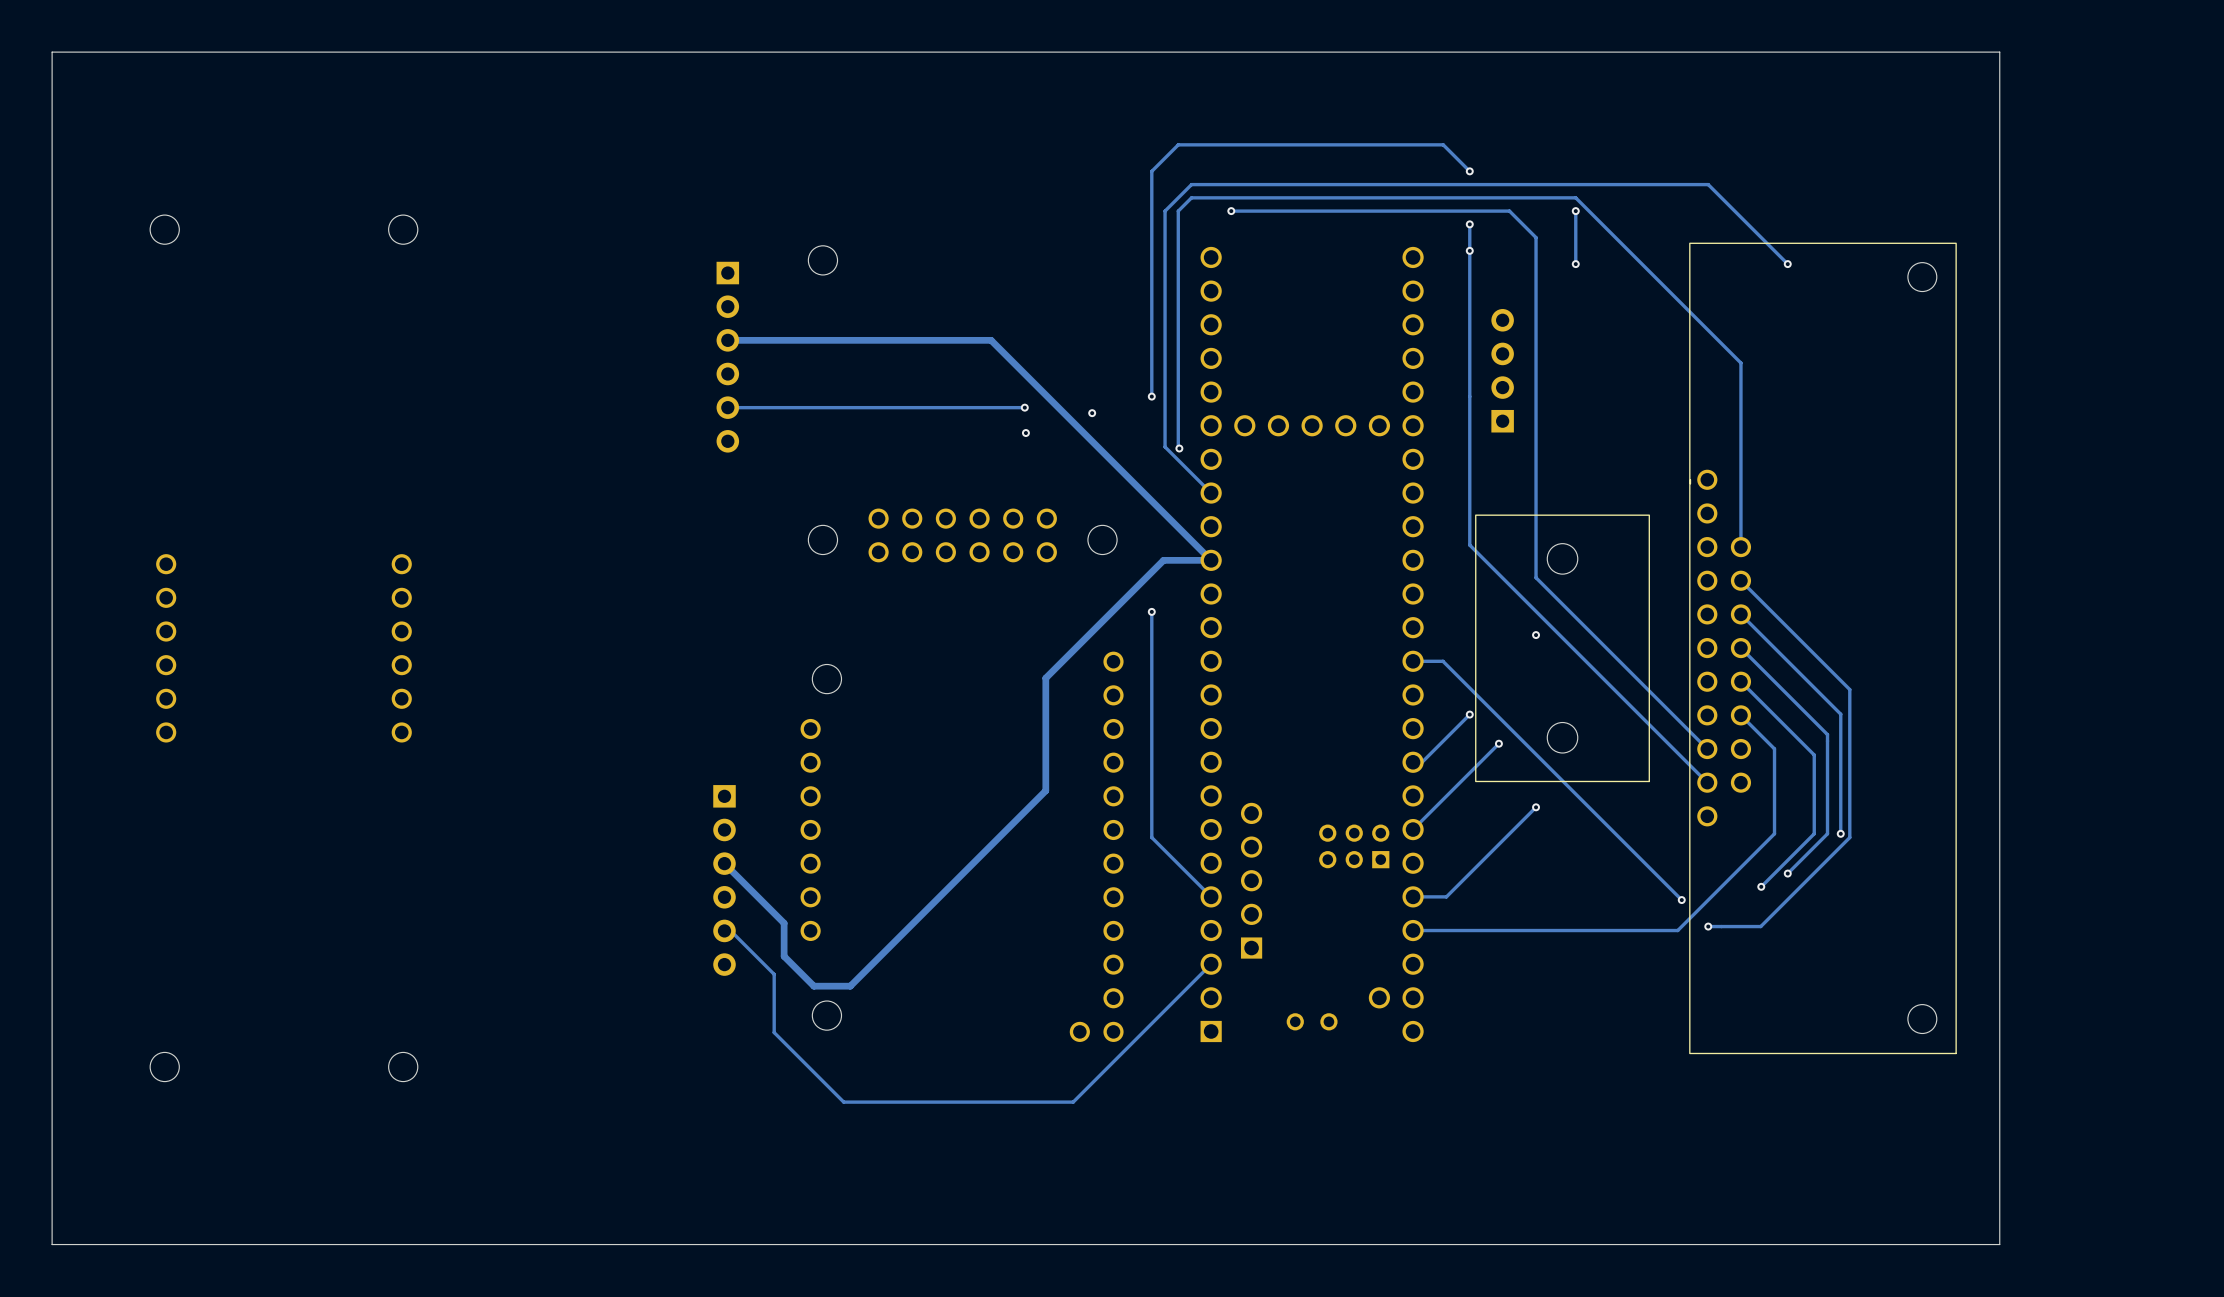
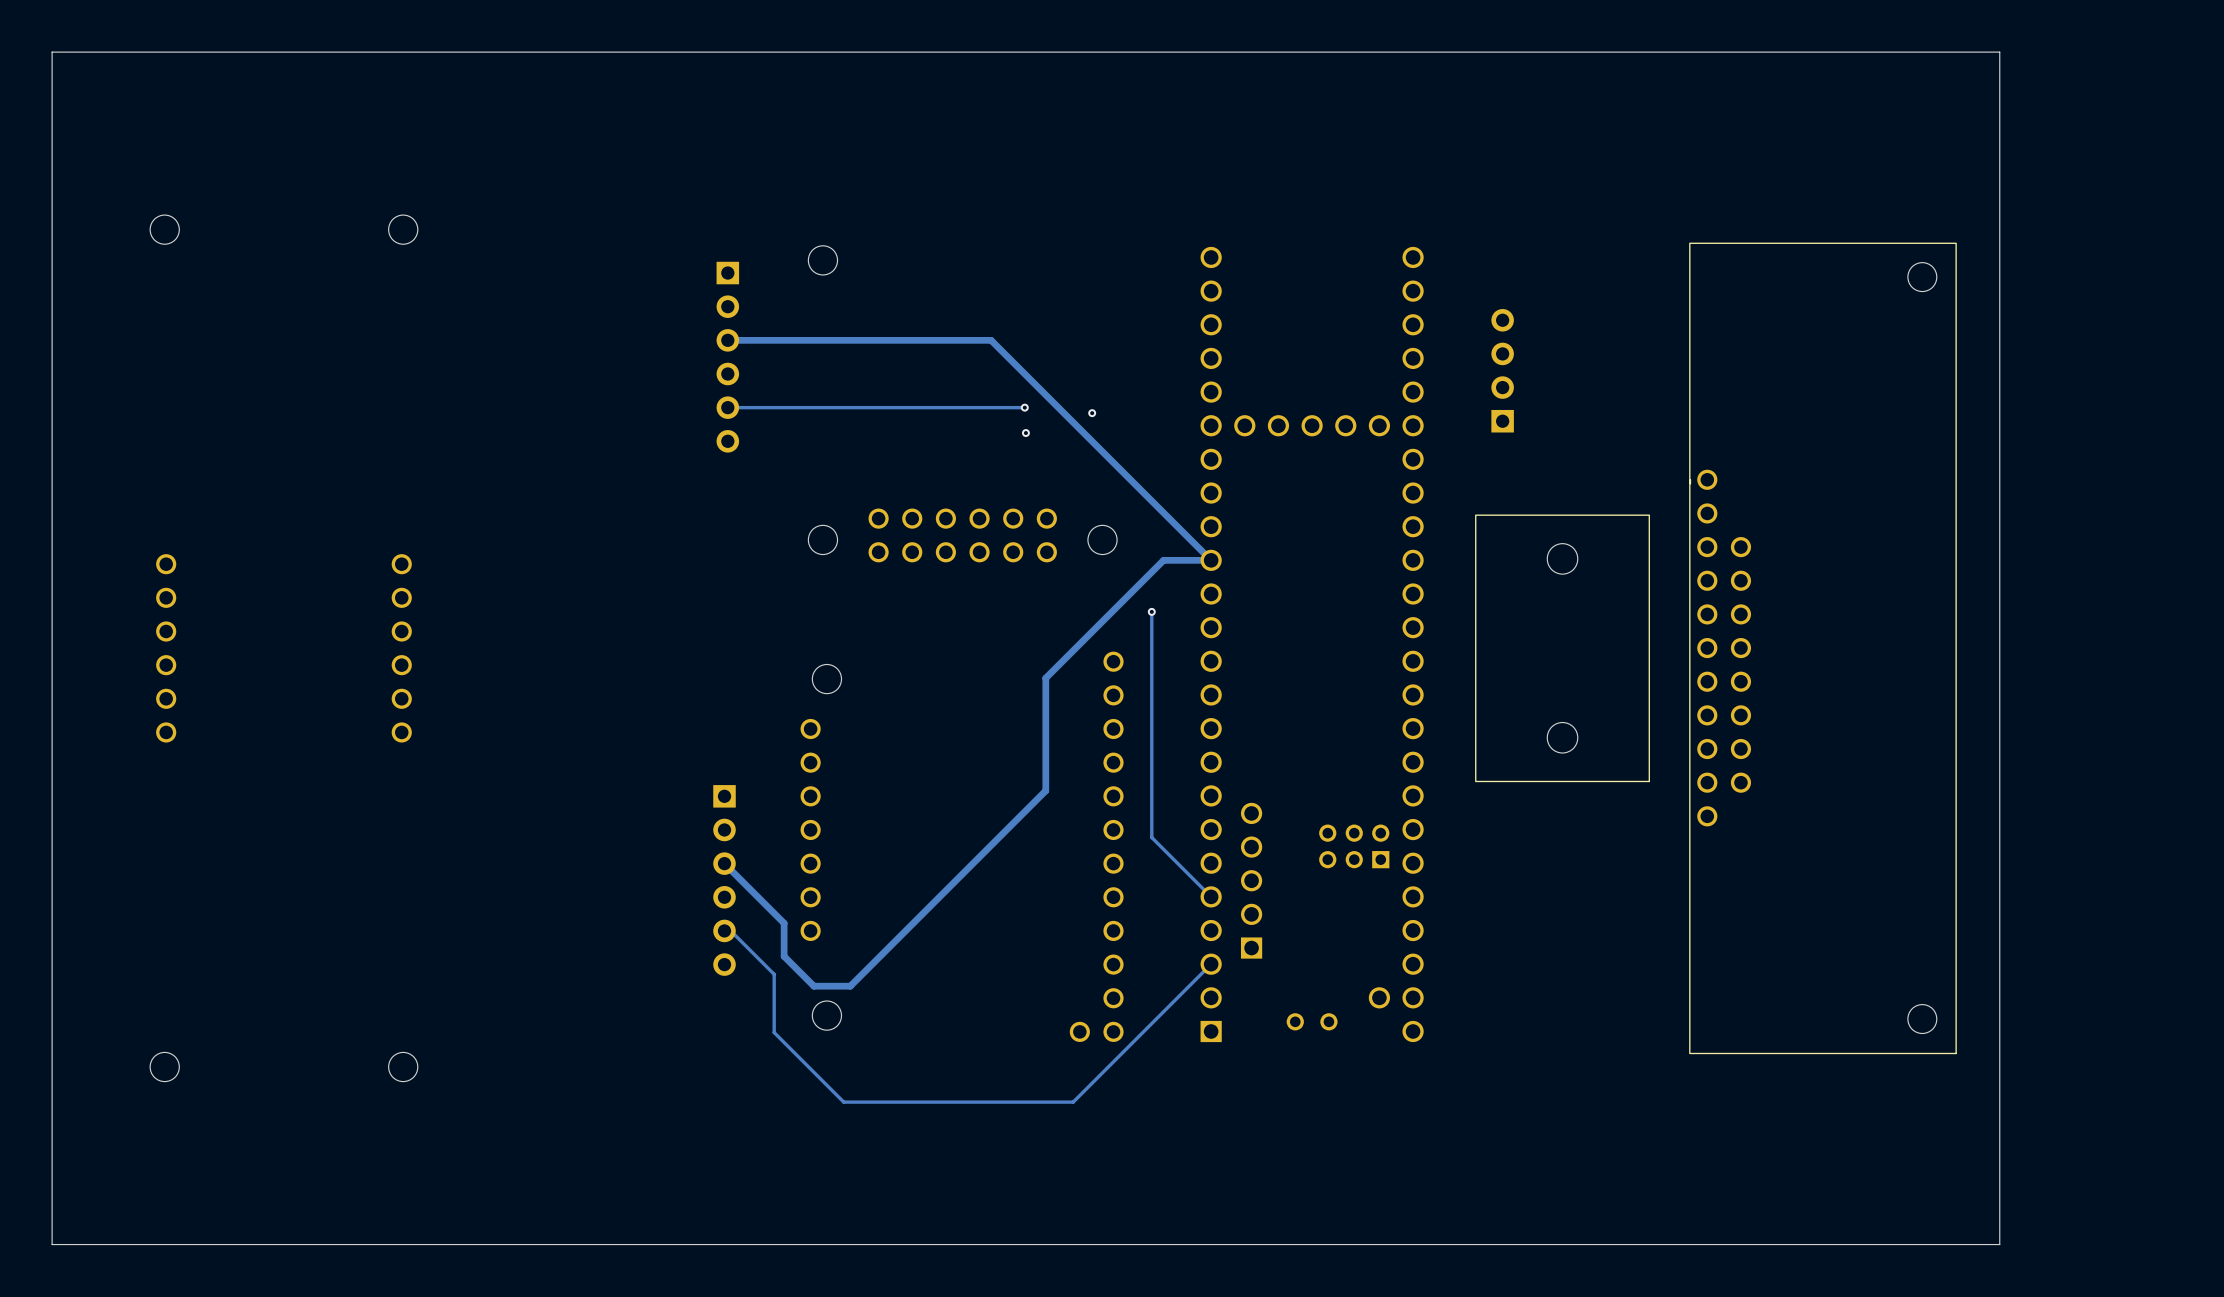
track: (1469, 171) (1443, 144) (1178, 144) (1151, 171) (1151, 396) -> none
via: (1469, 171) -> none
track: (1231, 211) (1509, 211) (1536, 237) (1536, 577) (1707, 749) -> none
via: (1231, 211) -> none
track: (1575, 211) (1575, 264) -> none
via: (1575, 211) -> none
track: (1469, 224) (1469, 545) (1707, 782) -> none
via: (1469, 224) -> none
via: (1469, 250) -> none
via: (1575, 264) -> none
track: (1787, 264) (1708, 184) (1191, 184) (1165, 211) (1165, 446) (1211, 493) -> none
via: (1787, 264) -> none
via: (1151, 396) -> none
track: (1179, 448) (1178, 211) (1191, 197) (1575, 197) (1740, 363) (1740, 547) -> none
via: (1179, 448) -> none
track: (1740, 580) (1849, 689) (1849, 837) (1760, 926) (1708, 926) -> none
track: (1740, 614) (1840, 714) (1840, 833) -> none
via: (1536, 635) -> none
track: (1740, 648) (1827, 734) (1827, 833) (1787, 873) -> none
track: (1413, 661) (1443, 661) (1681, 900) -> none
track: (1740, 681) (1814, 755) (1814, 833) (1761, 886) -> none
track: (1469, 714) (1422, 762) (1413, 762) -> none
via: (1469, 714) -> none
track: (1740, 715) (1774, 748) (1774, 833) (1677, 930) (1413, 930) -> none
track: (1498, 743) (1413, 829) -> none
via: (1498, 743) -> none
track: (1536, 807) (1446, 896) (1413, 896) -> none
via: (1536, 807) -> none
via: (1840, 833) -> none
via: (1787, 873) -> none
via: (1761, 886) -> none
via: (1681, 900) -> none
via: (1708, 926) -> none

